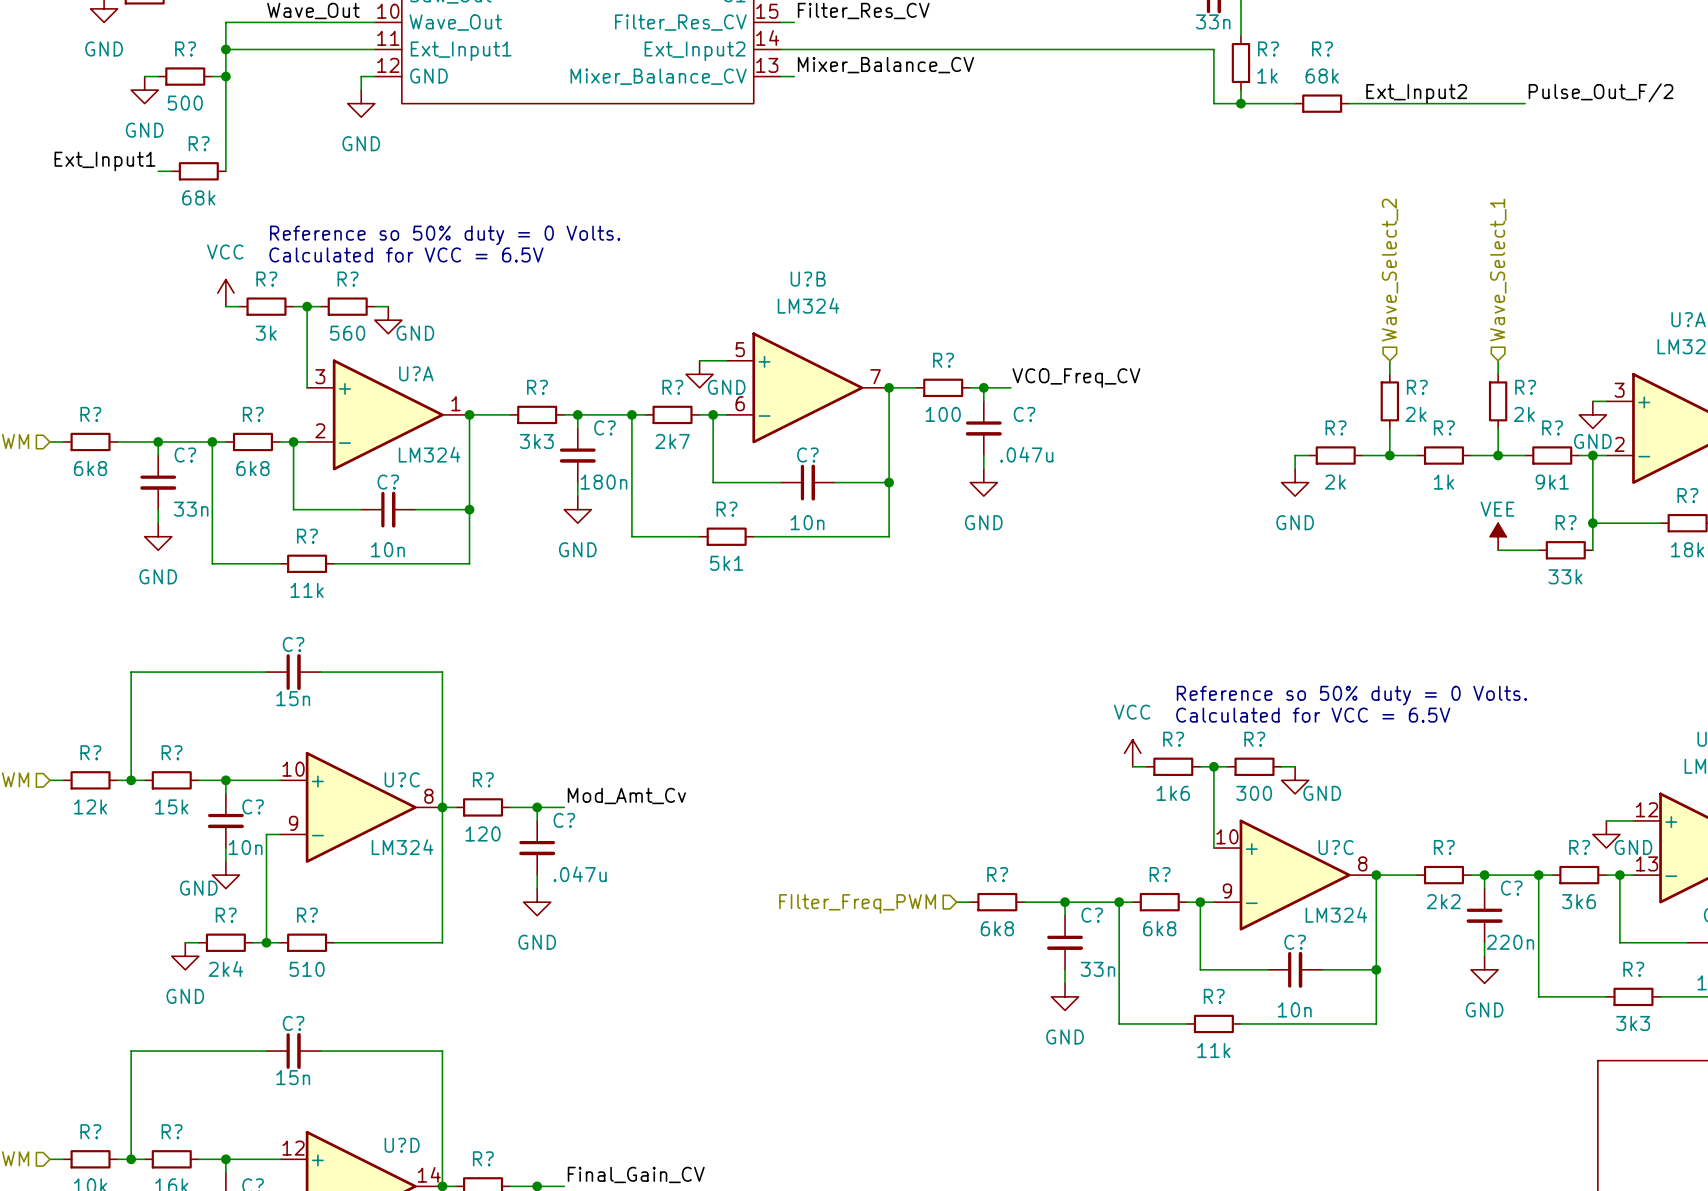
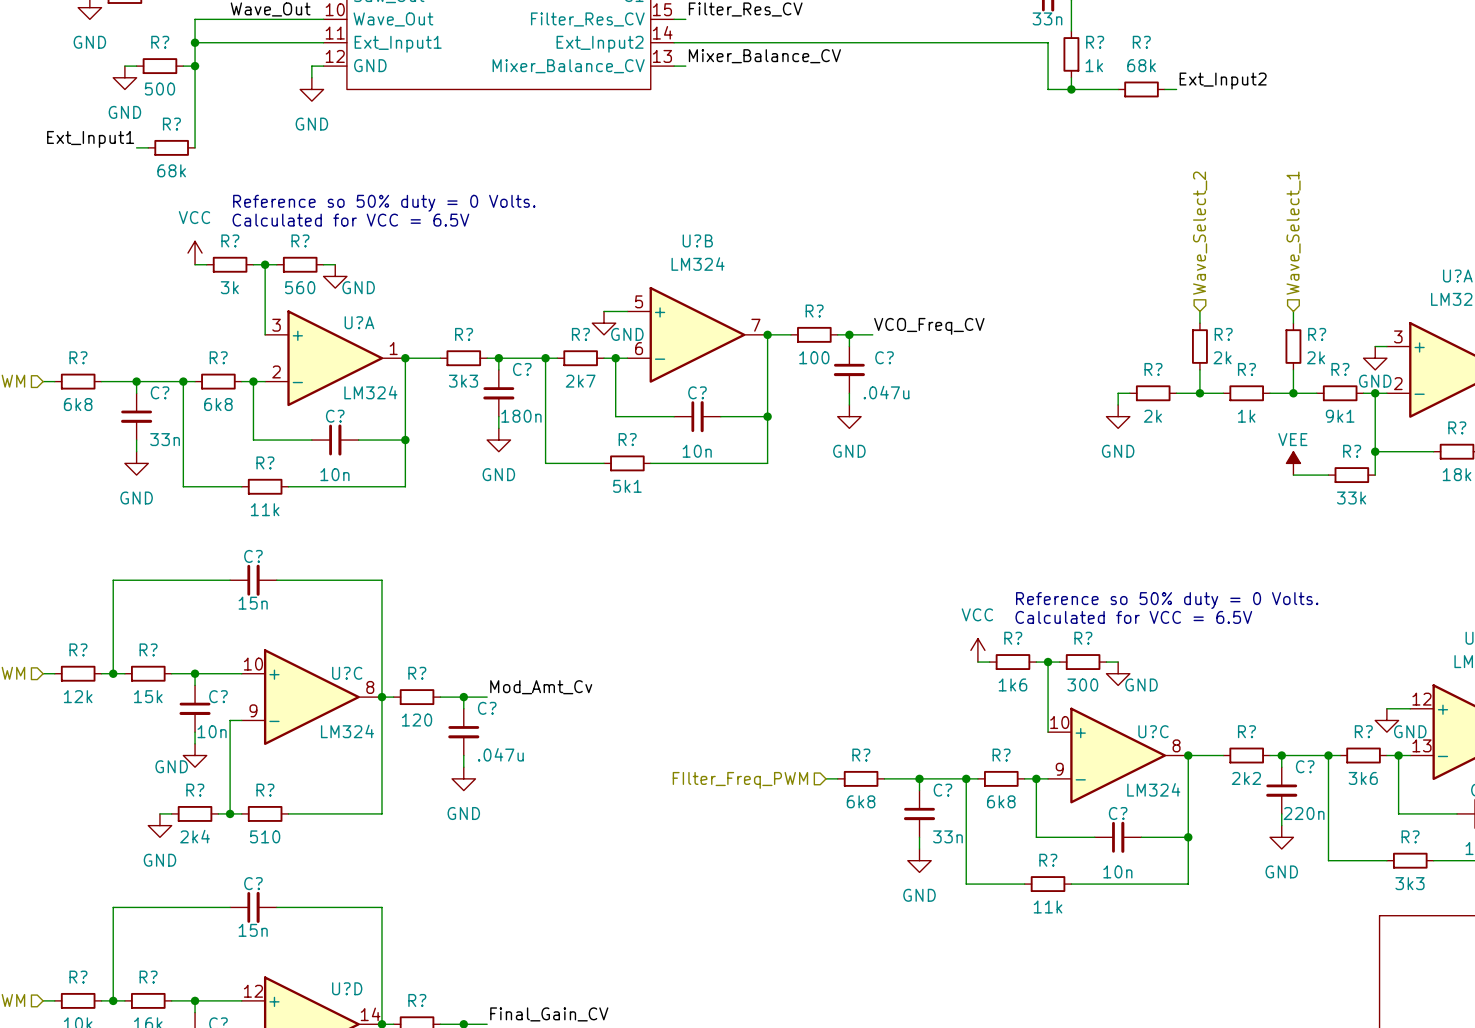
label: Pulse_Out_F/2 (1601, 92) -> none
wire: (1362, 103) (1525, 103) -> none

